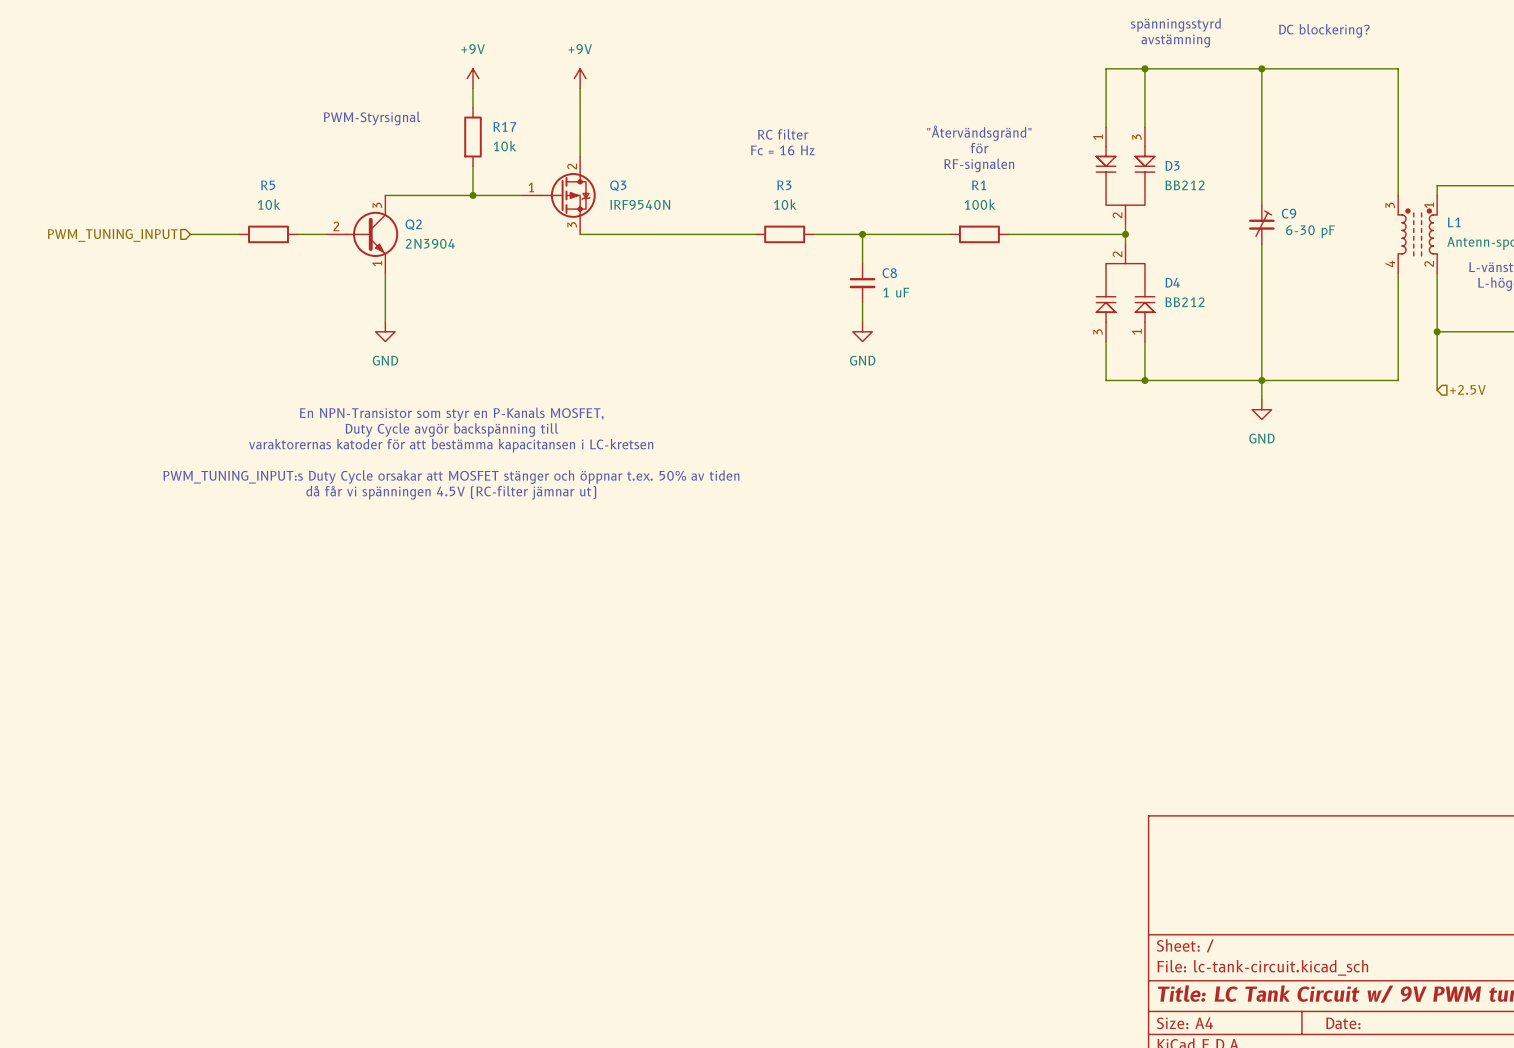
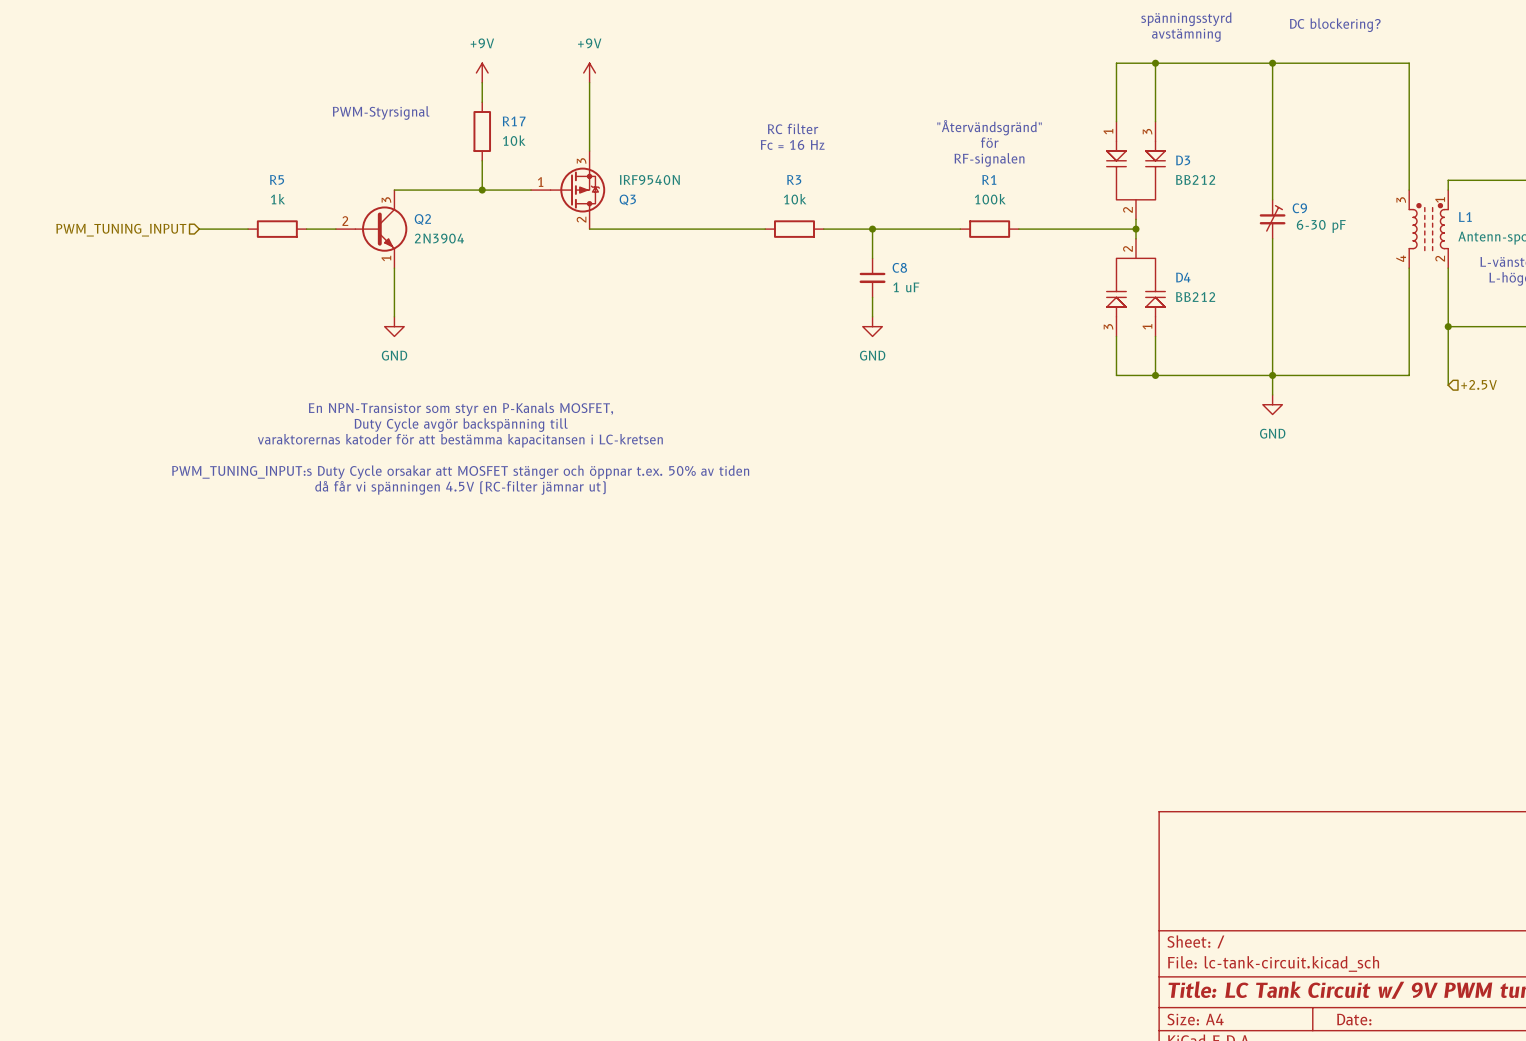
Q3 flip: as is (568, 195) -> up-down (577, 190)
R5 value: 10k (269, 204) -> 1k (277, 199)

